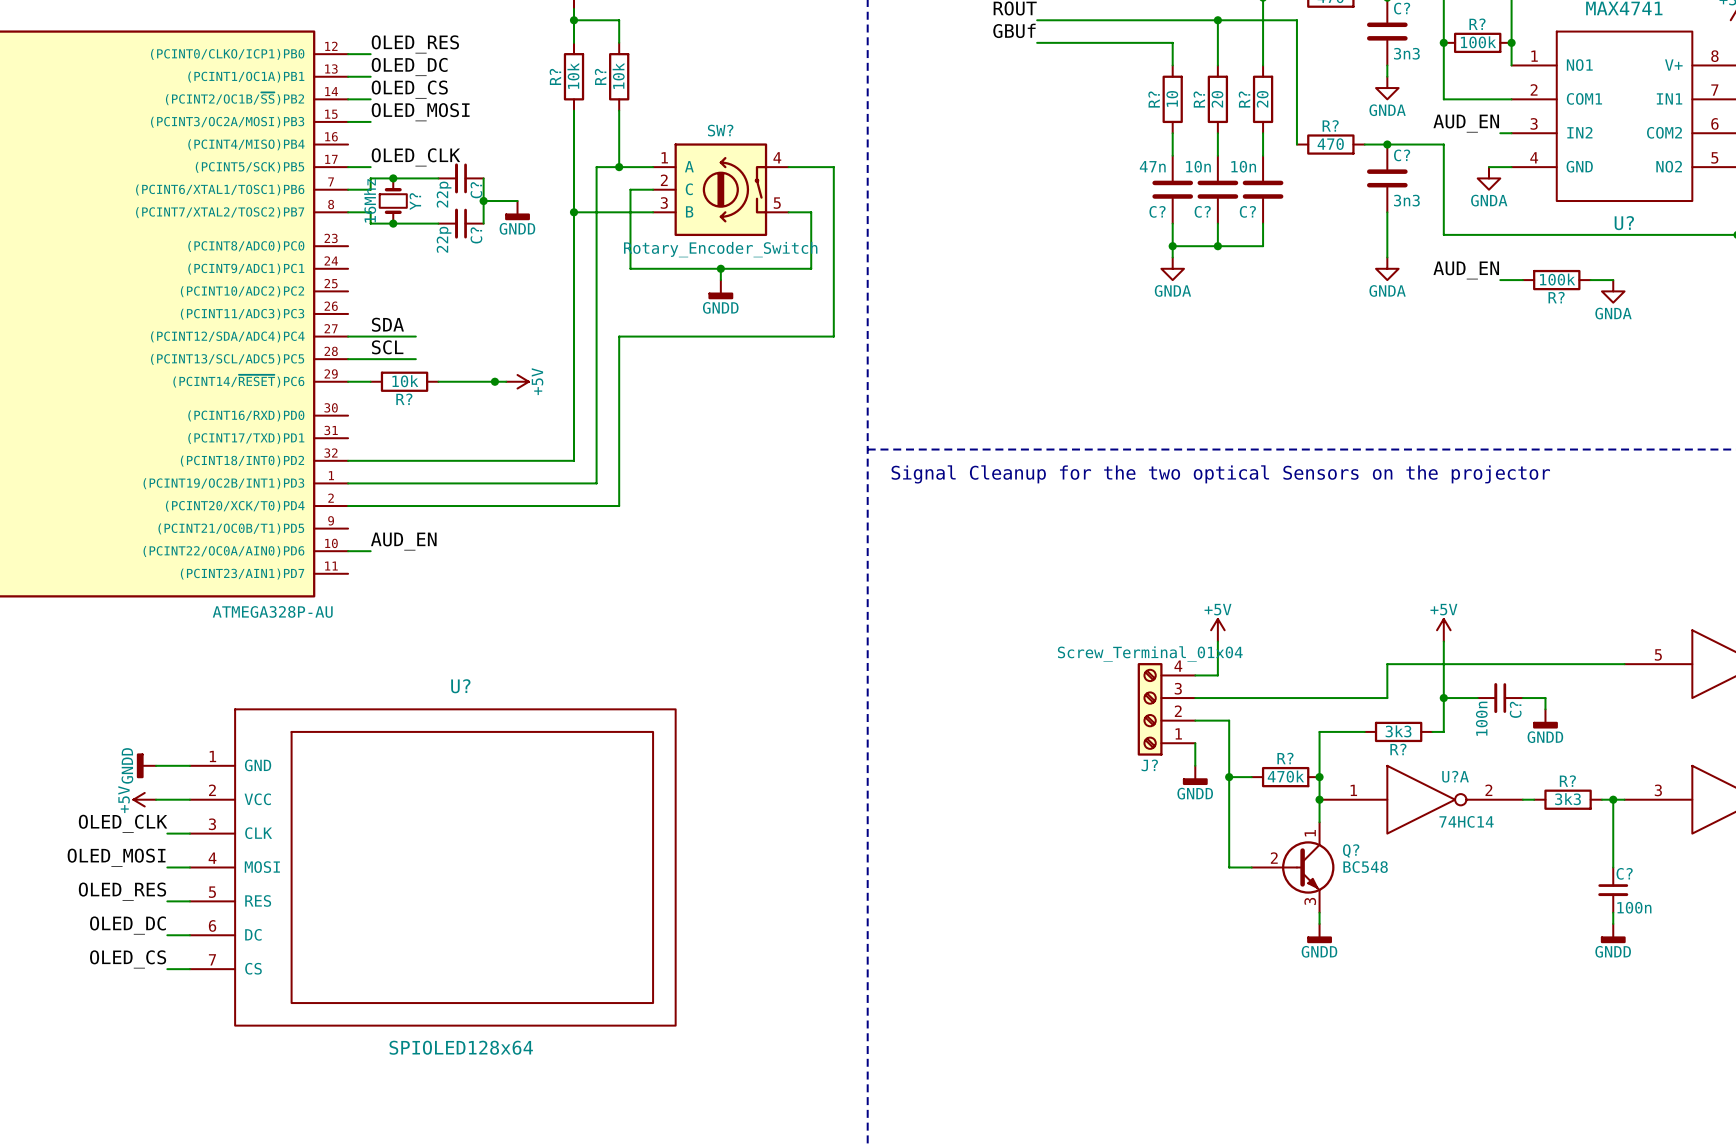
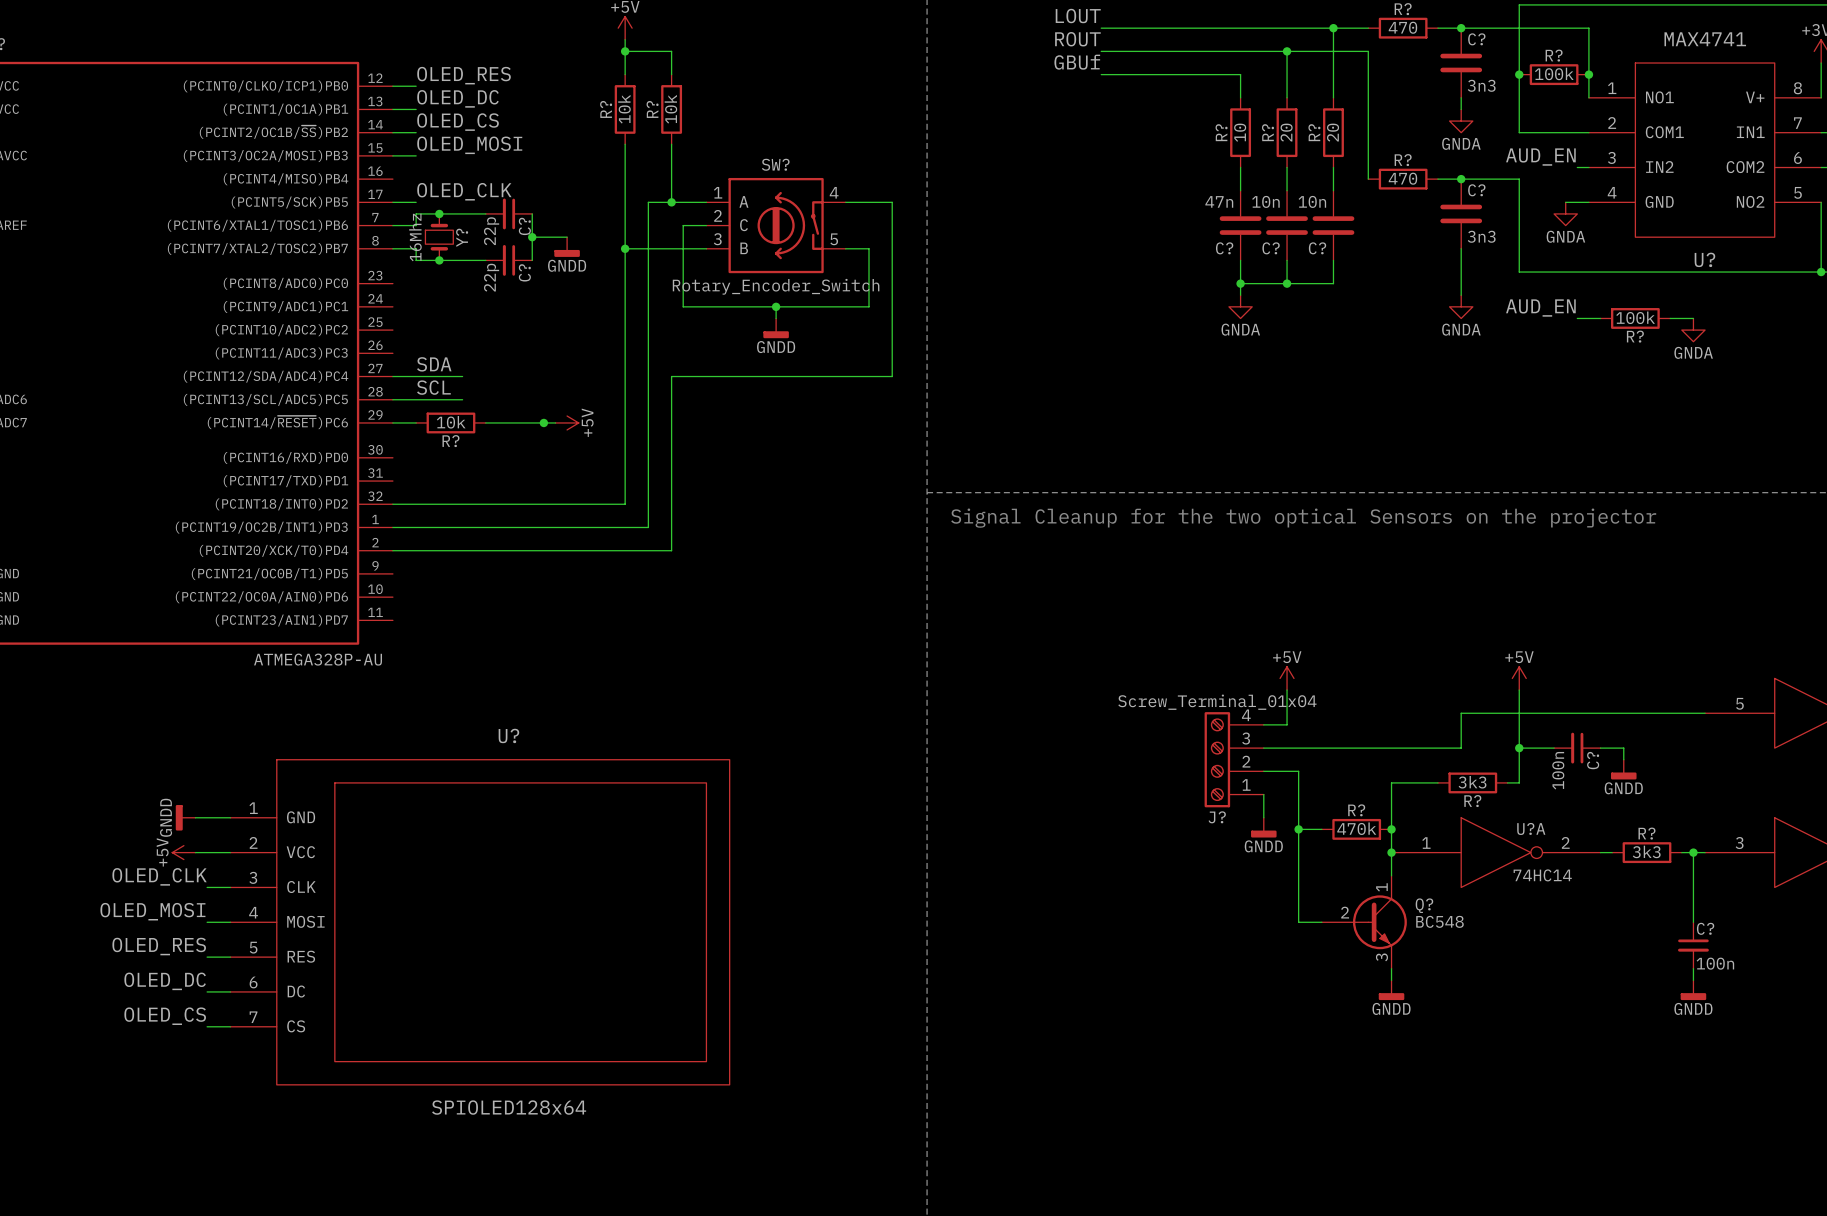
label: AUD_EN (403, 541) -> none
wire: (348, 551) (370, 551) -> none

